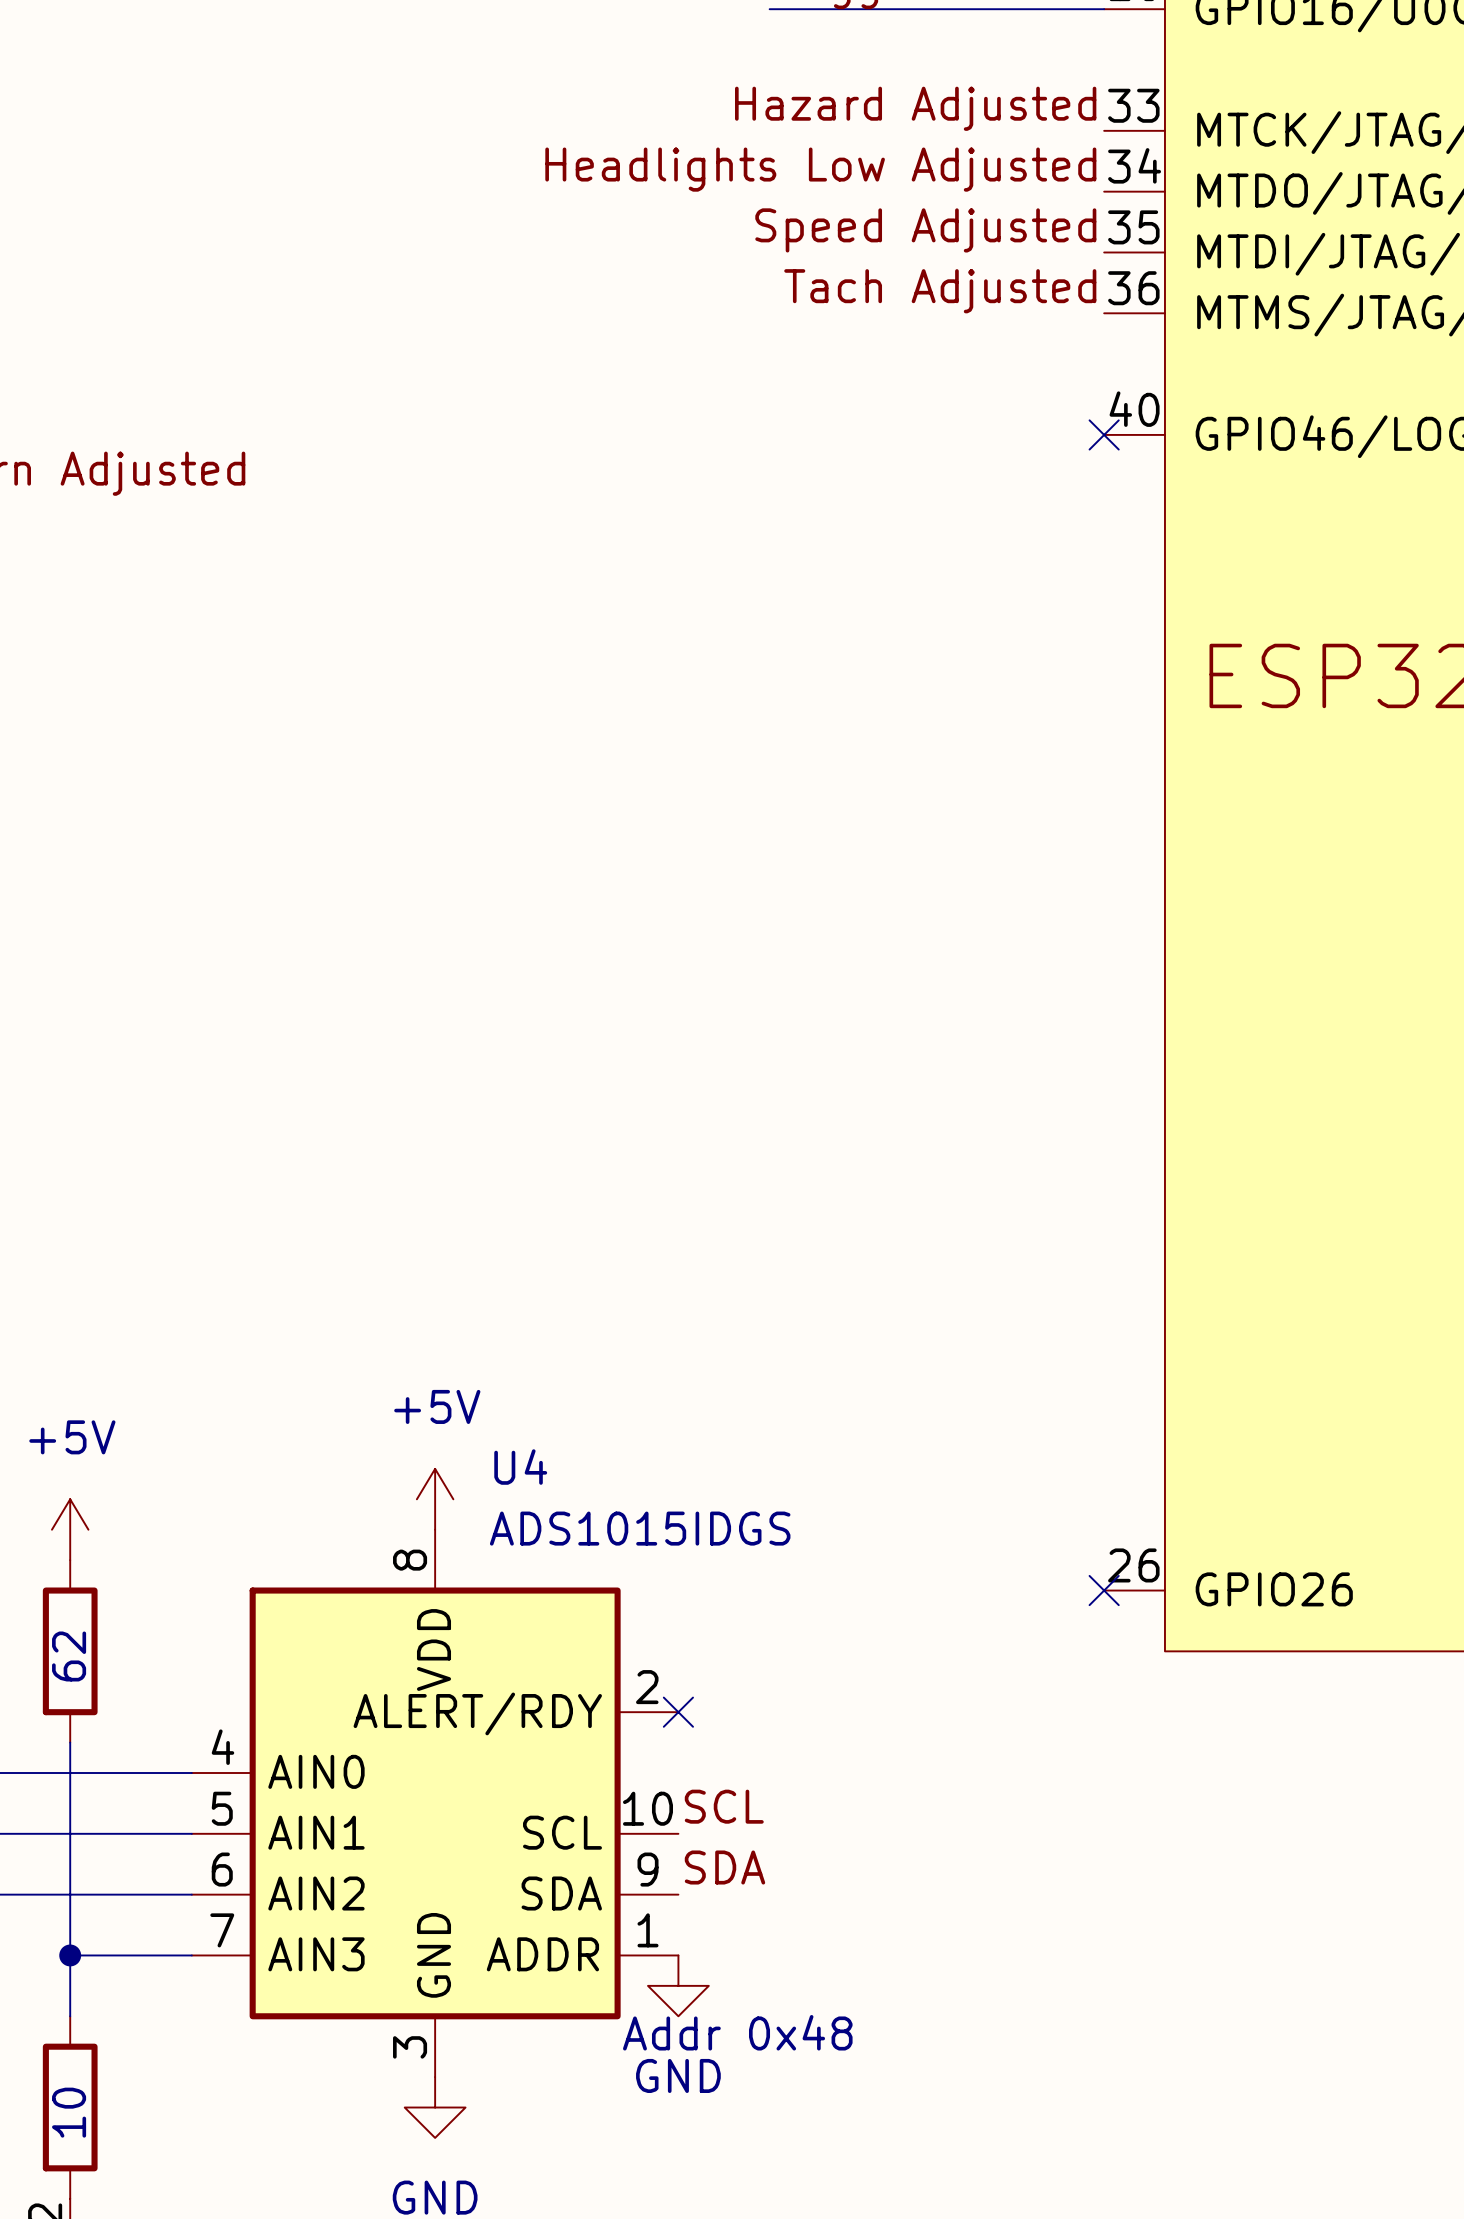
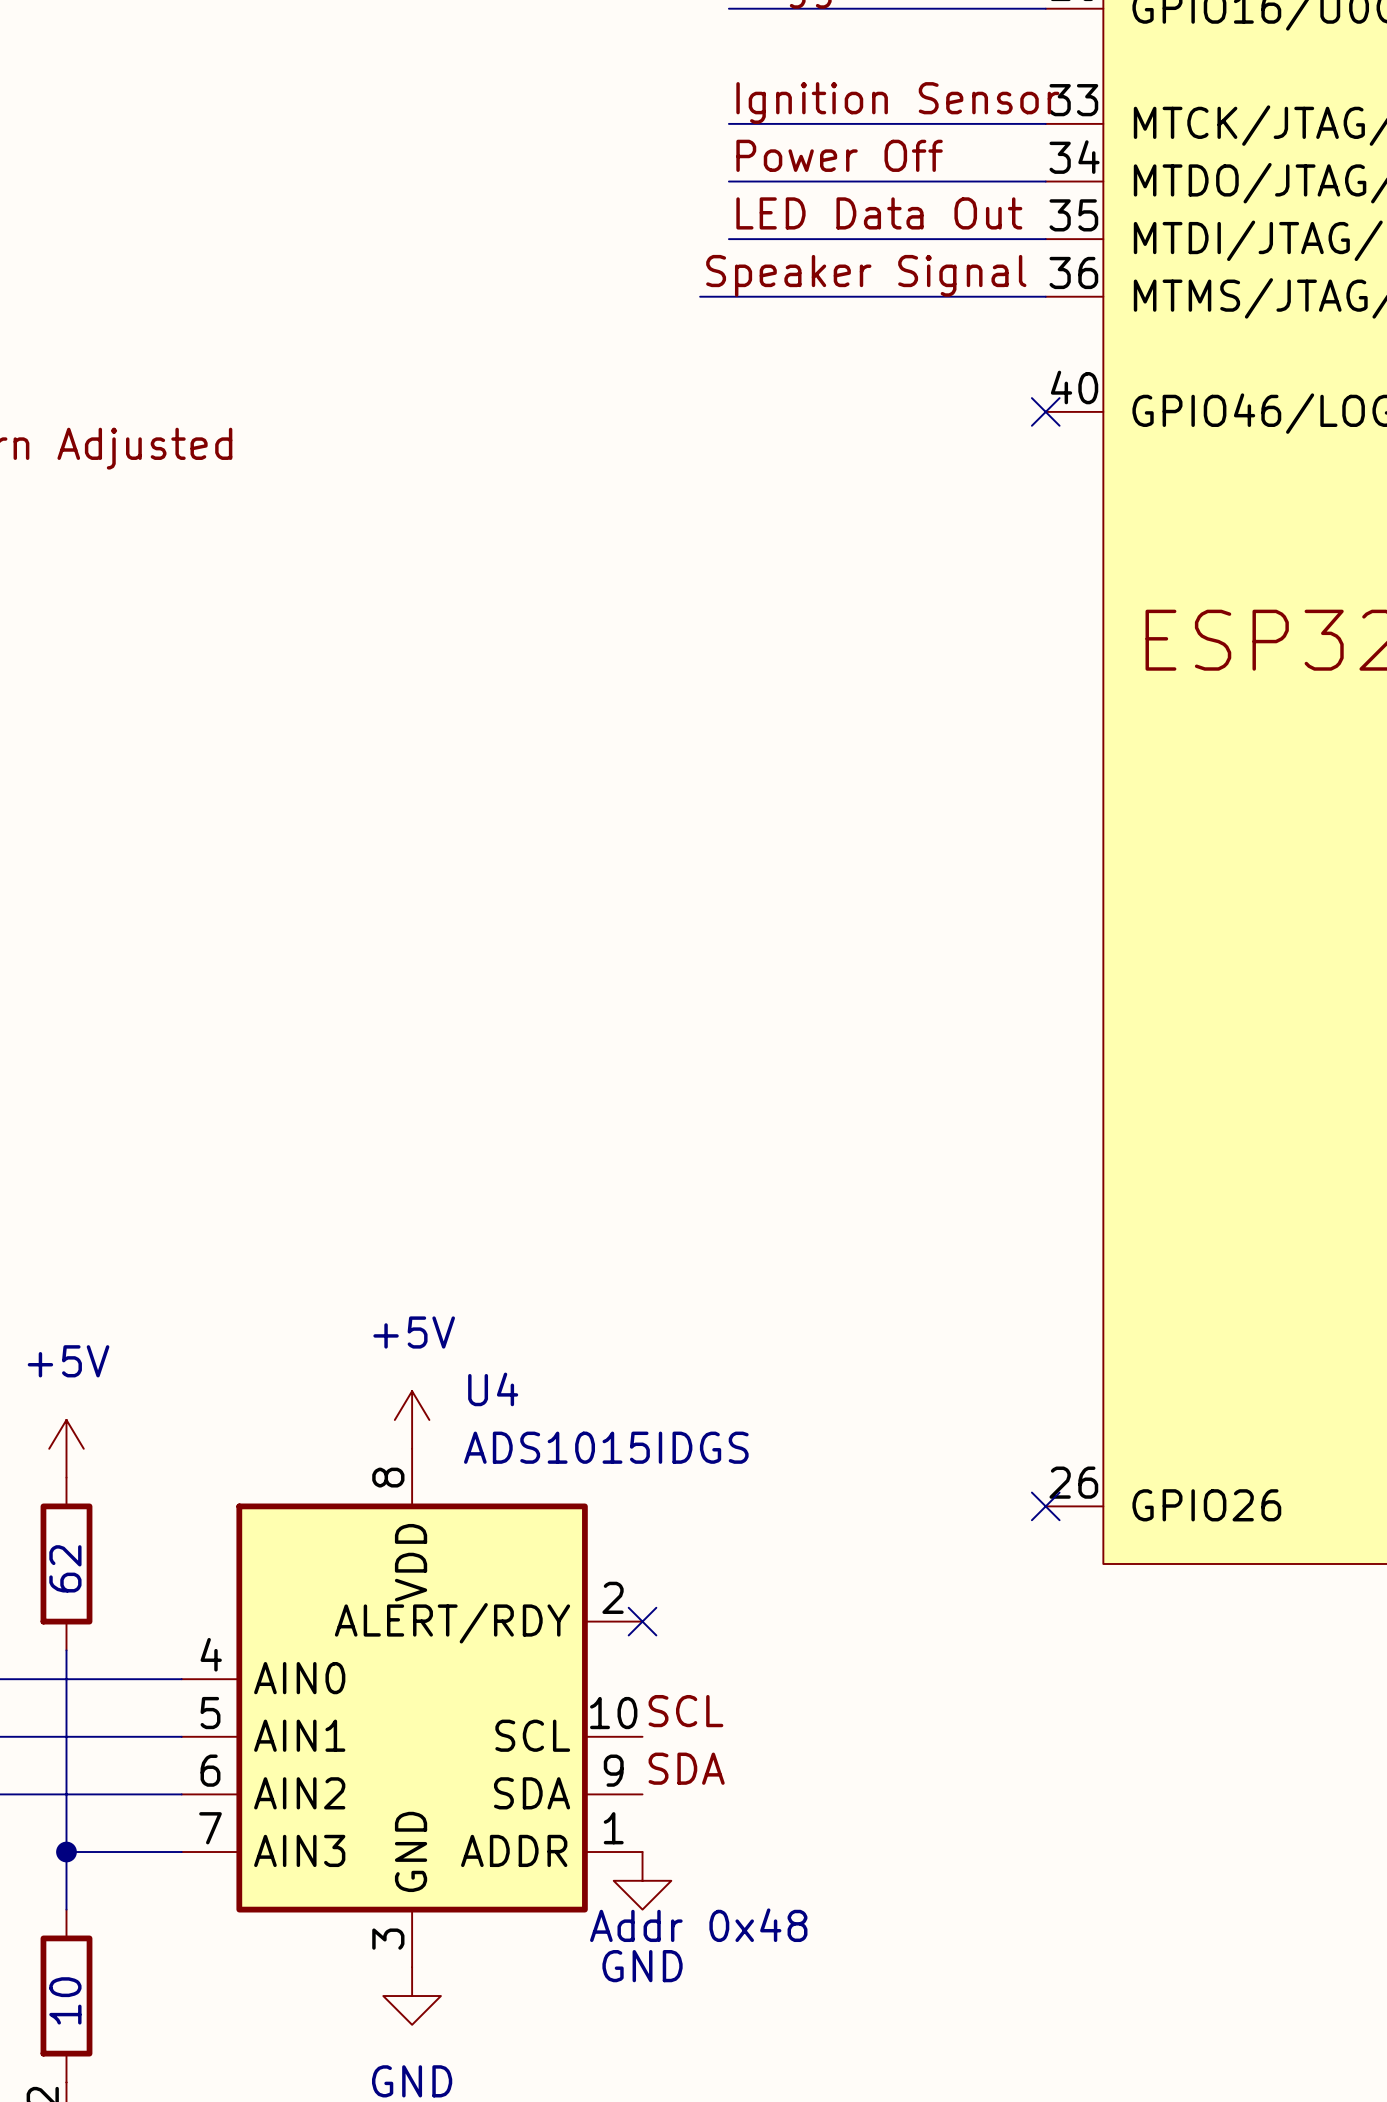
label: Hazard Adjusted (915, 108) -> none
label: none -> Ignition Sensor (897, 103)
wire: none -> (728, 123) (1045, 123)
label: none -> Power Off (839, 155)
label: Headlights Low Adjusted (820, 169) -> none
wire: none -> (728, 181) (1045, 181)
label: none -> LED Data Out (879, 213)
label: Speed Adjusted (925, 230) -> none
wire: none -> (728, 239) (1045, 239)
label: none -> Speaker Signal (866, 275)
label: Tach Adjusted (940, 291) -> none
wire: none -> (700, 296) (1045, 296)

